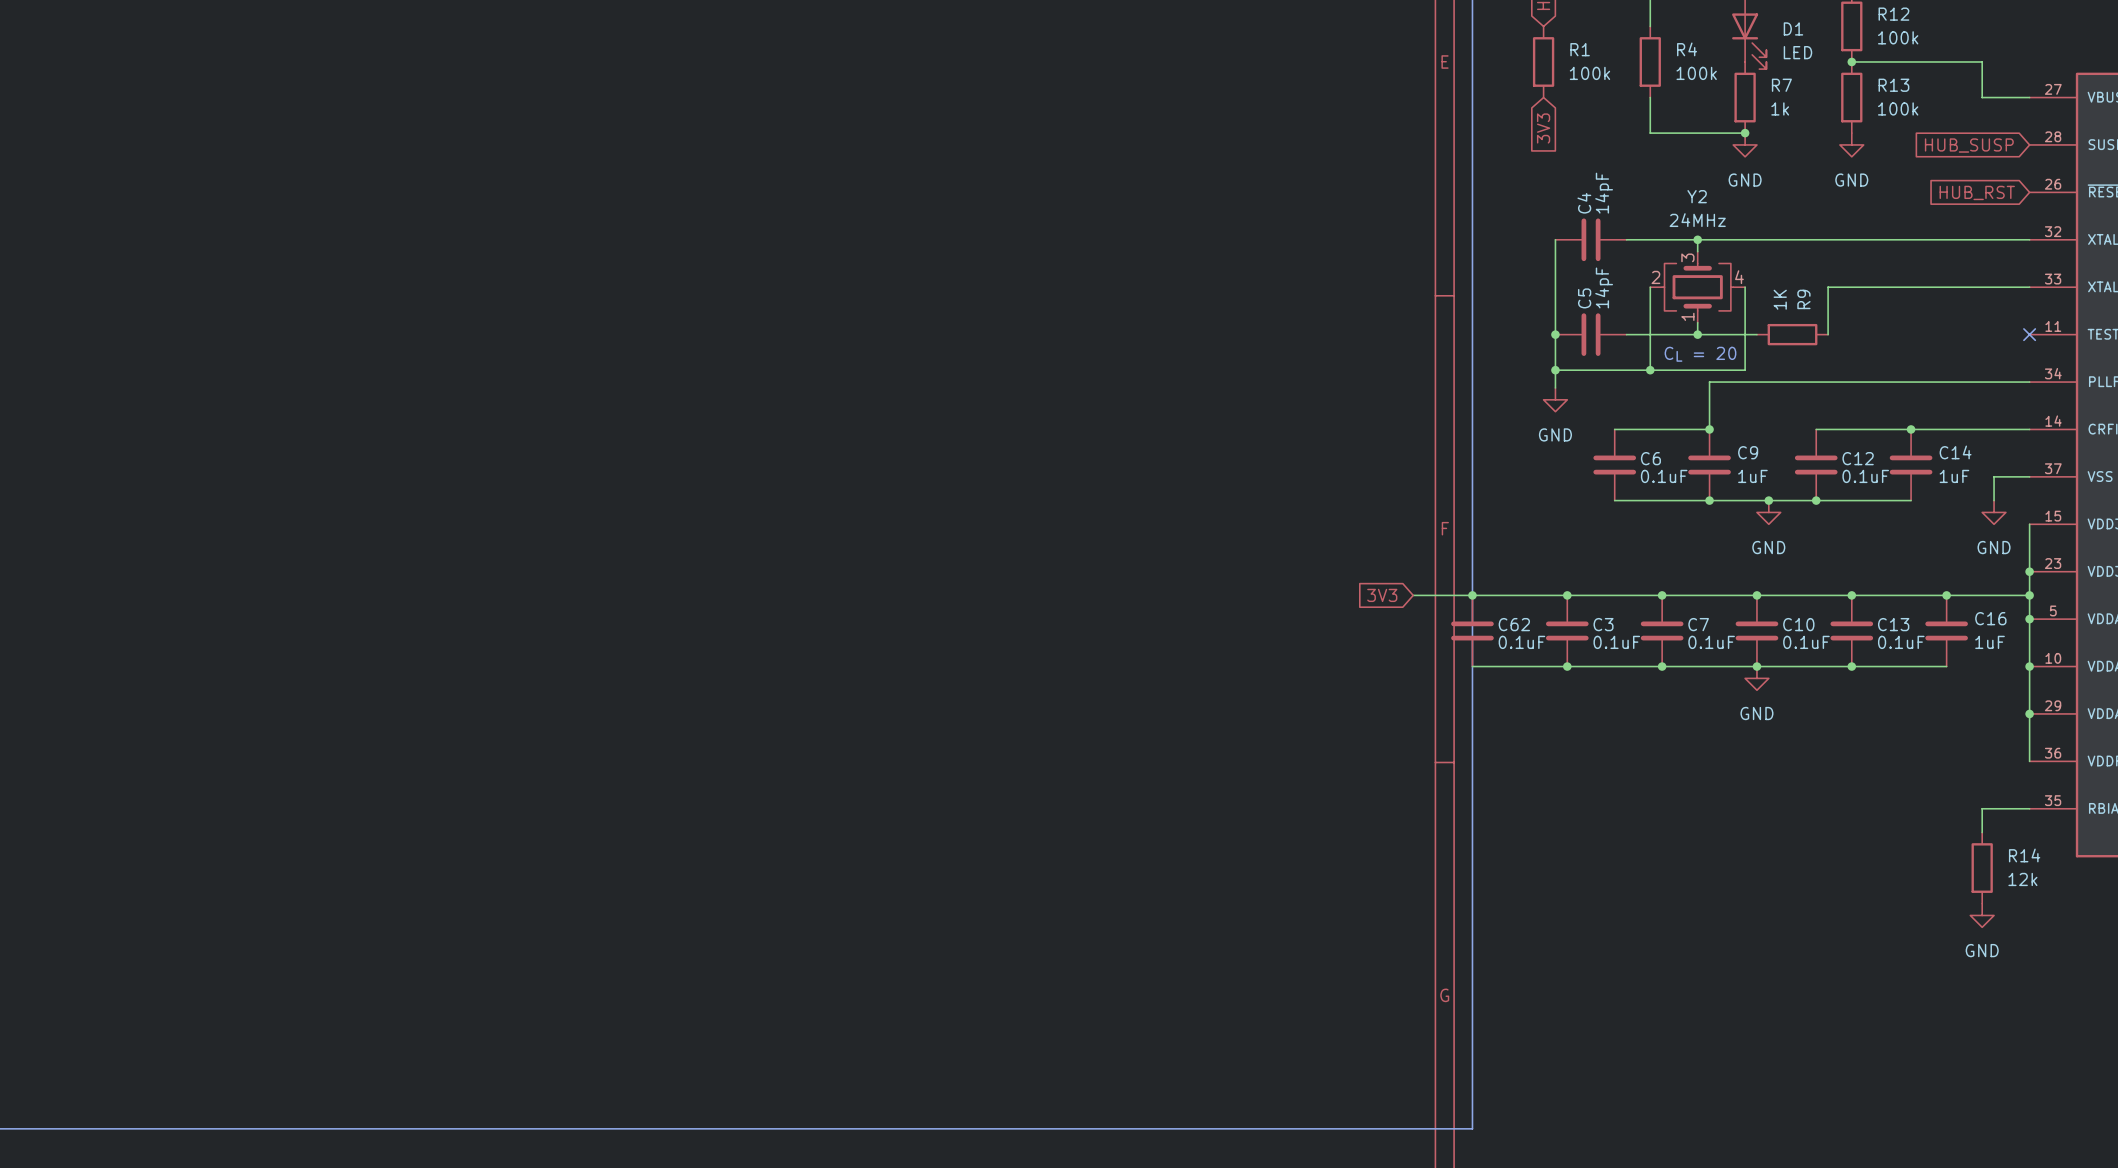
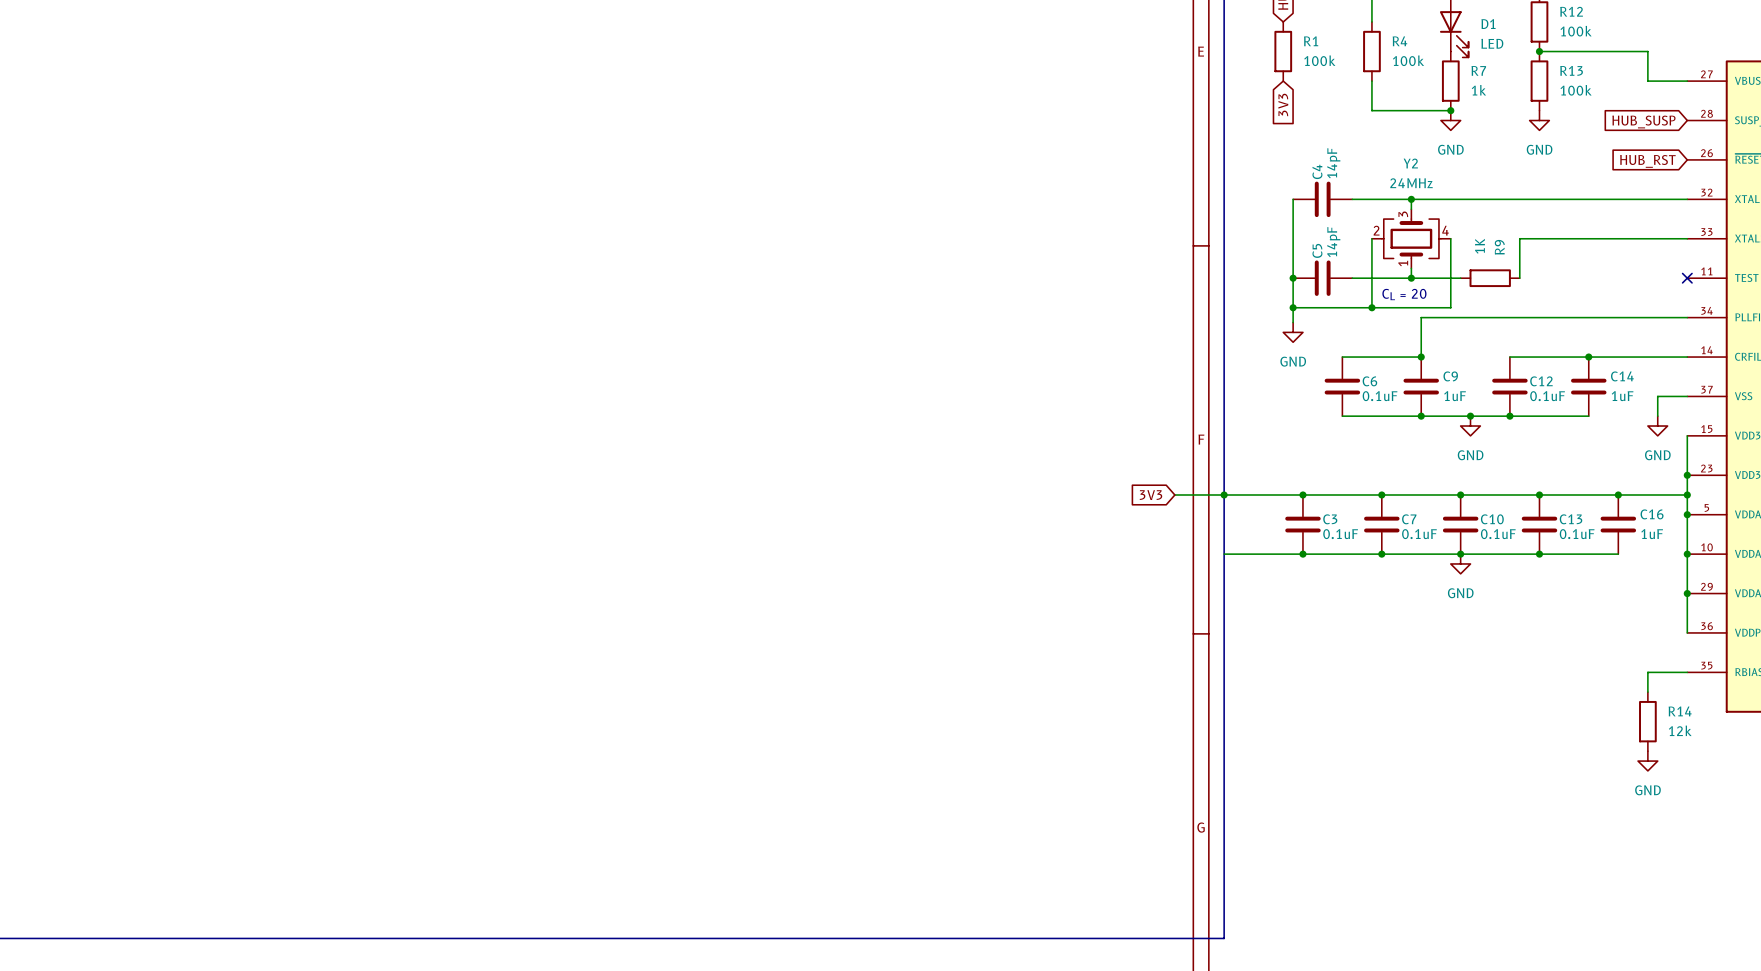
C62: 0.1uF (1472, 630) -> none

